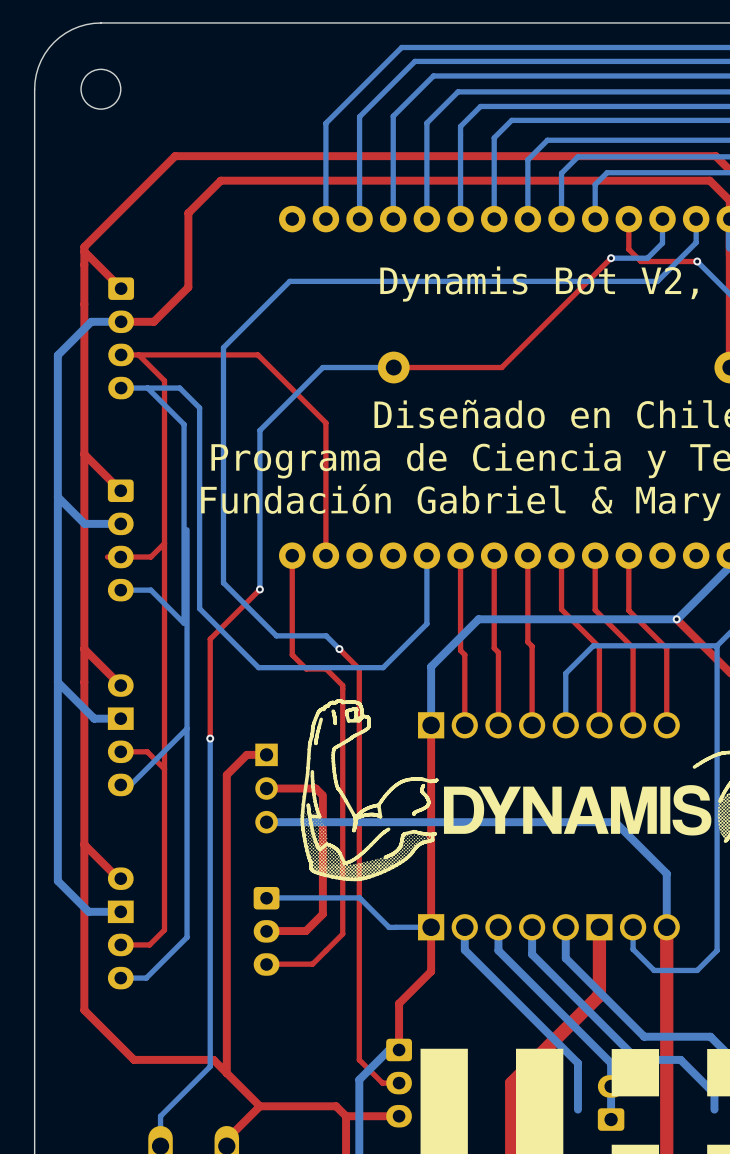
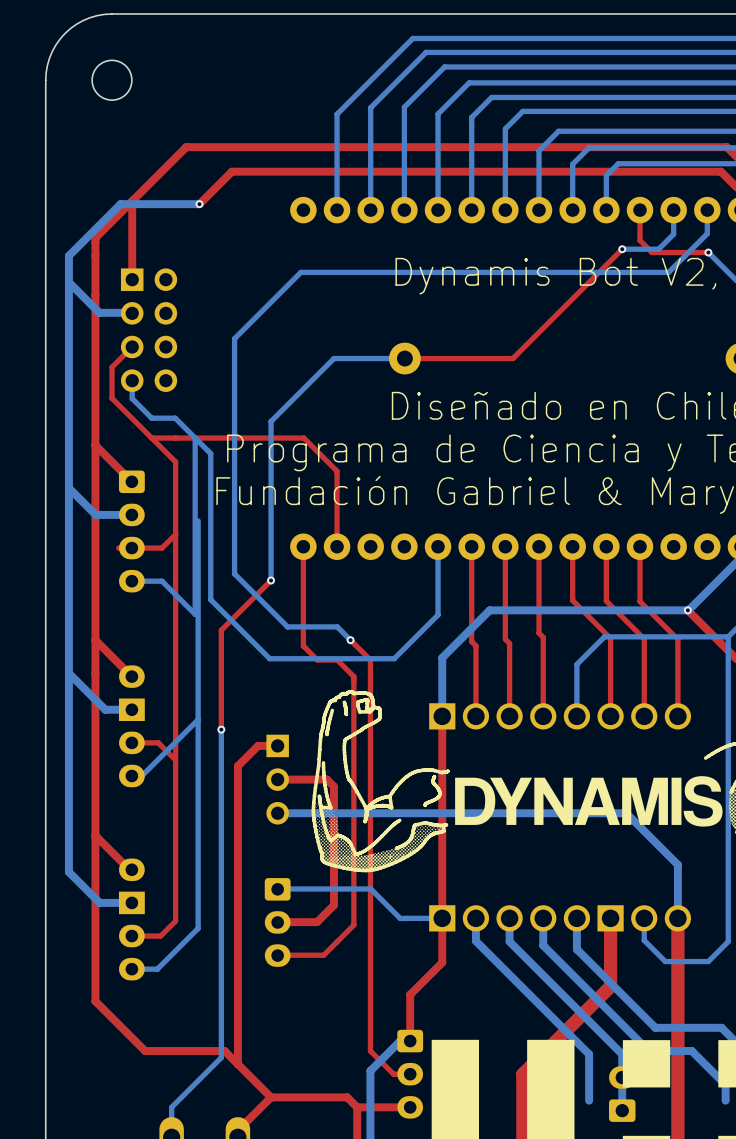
bottom track: none -> (199, 204) (120, 204) (68, 255) (68, 346)
top track: (188, 213) (188, 287) (153, 321) (121, 321) -> none
via: none -> (199, 204)
top track: (84, 251) (121, 288) -> (132, 201) (132, 279)
bottom track: (91, 321) (57, 355) -> (102, 312) (99, 312) (68, 282)
part: (121, 338) -> none
part: none -> (149, 330)
top track: (121, 354) (257, 354) (325, 422) (325, 480) -> (151, 438) (303, 438) (337, 471)
top track: (138, 354) (164, 380) (164, 470) -> (132, 347) (112, 367) (112, 398) (175, 461)
bottom track: (121, 388) (179, 388) (199, 407) (199, 462) -> (132, 379) (132, 398) (151, 418) (175, 418) (210, 453)
bottom track: (147, 388) (184, 424) (184, 447) -> none

